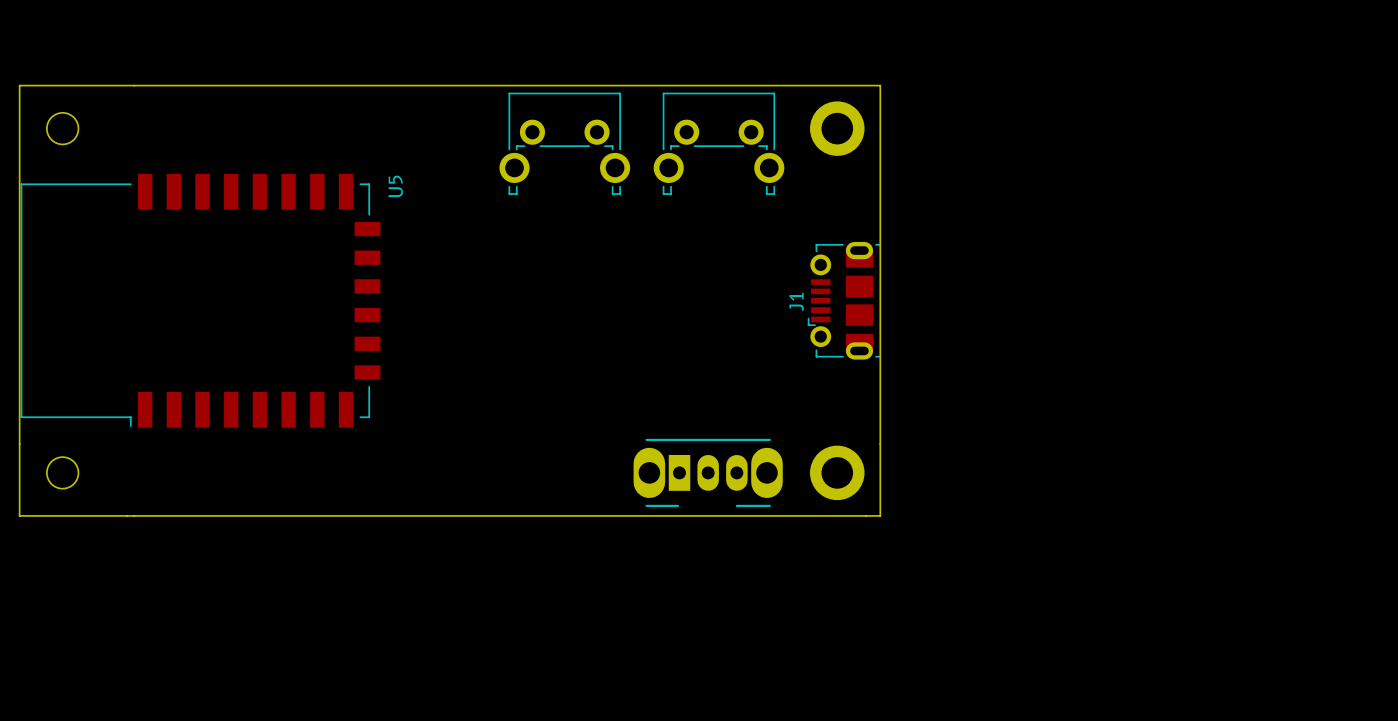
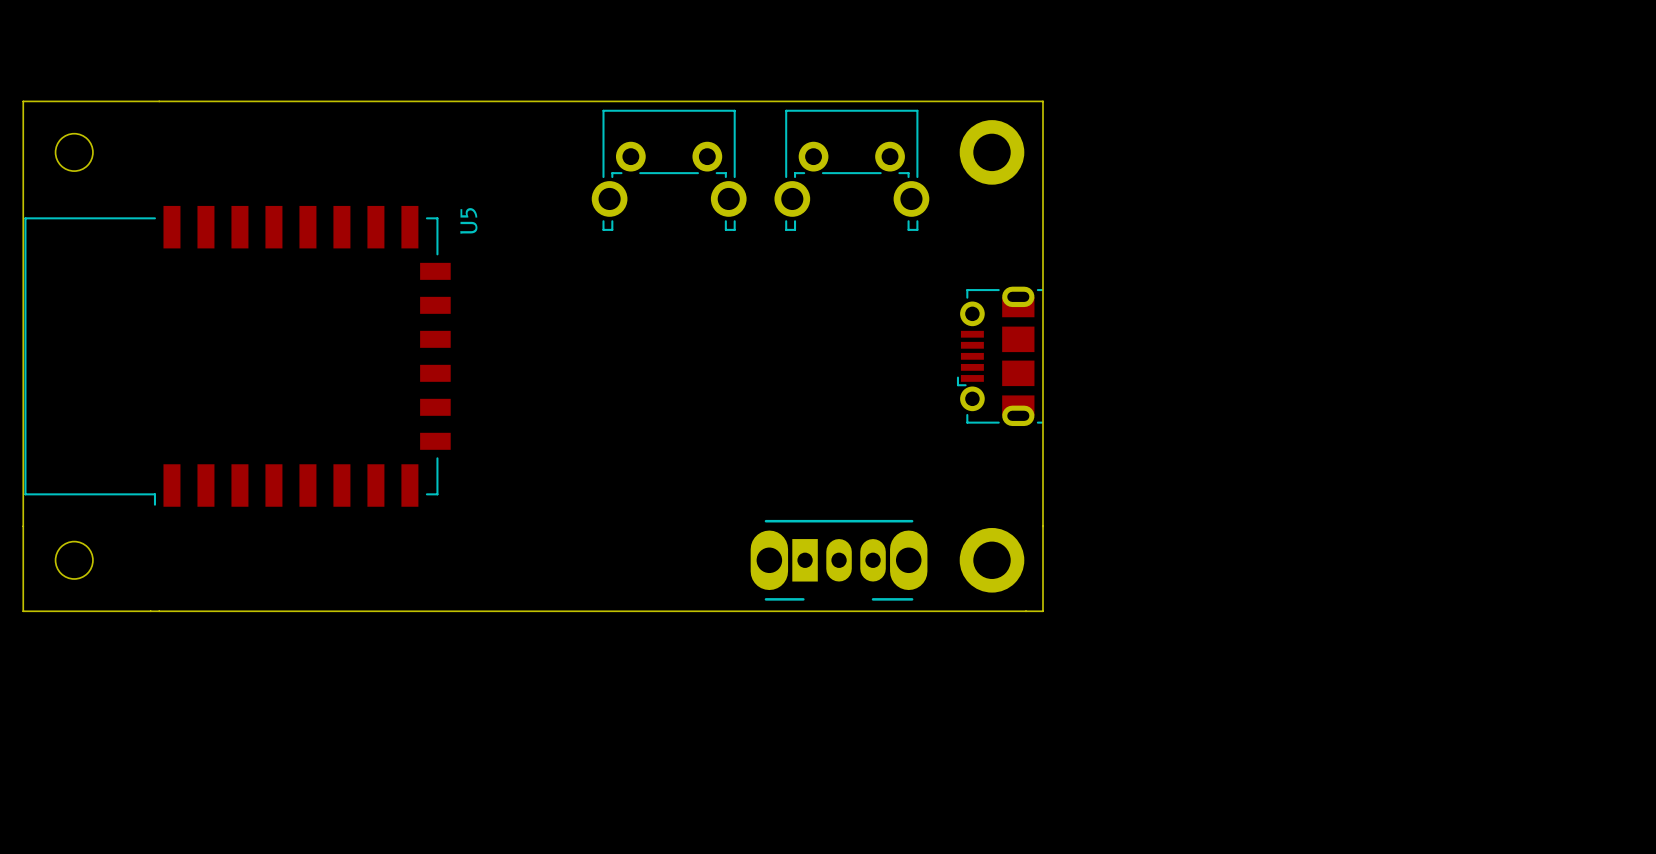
J1 name: J1 (796, 301) -> none

